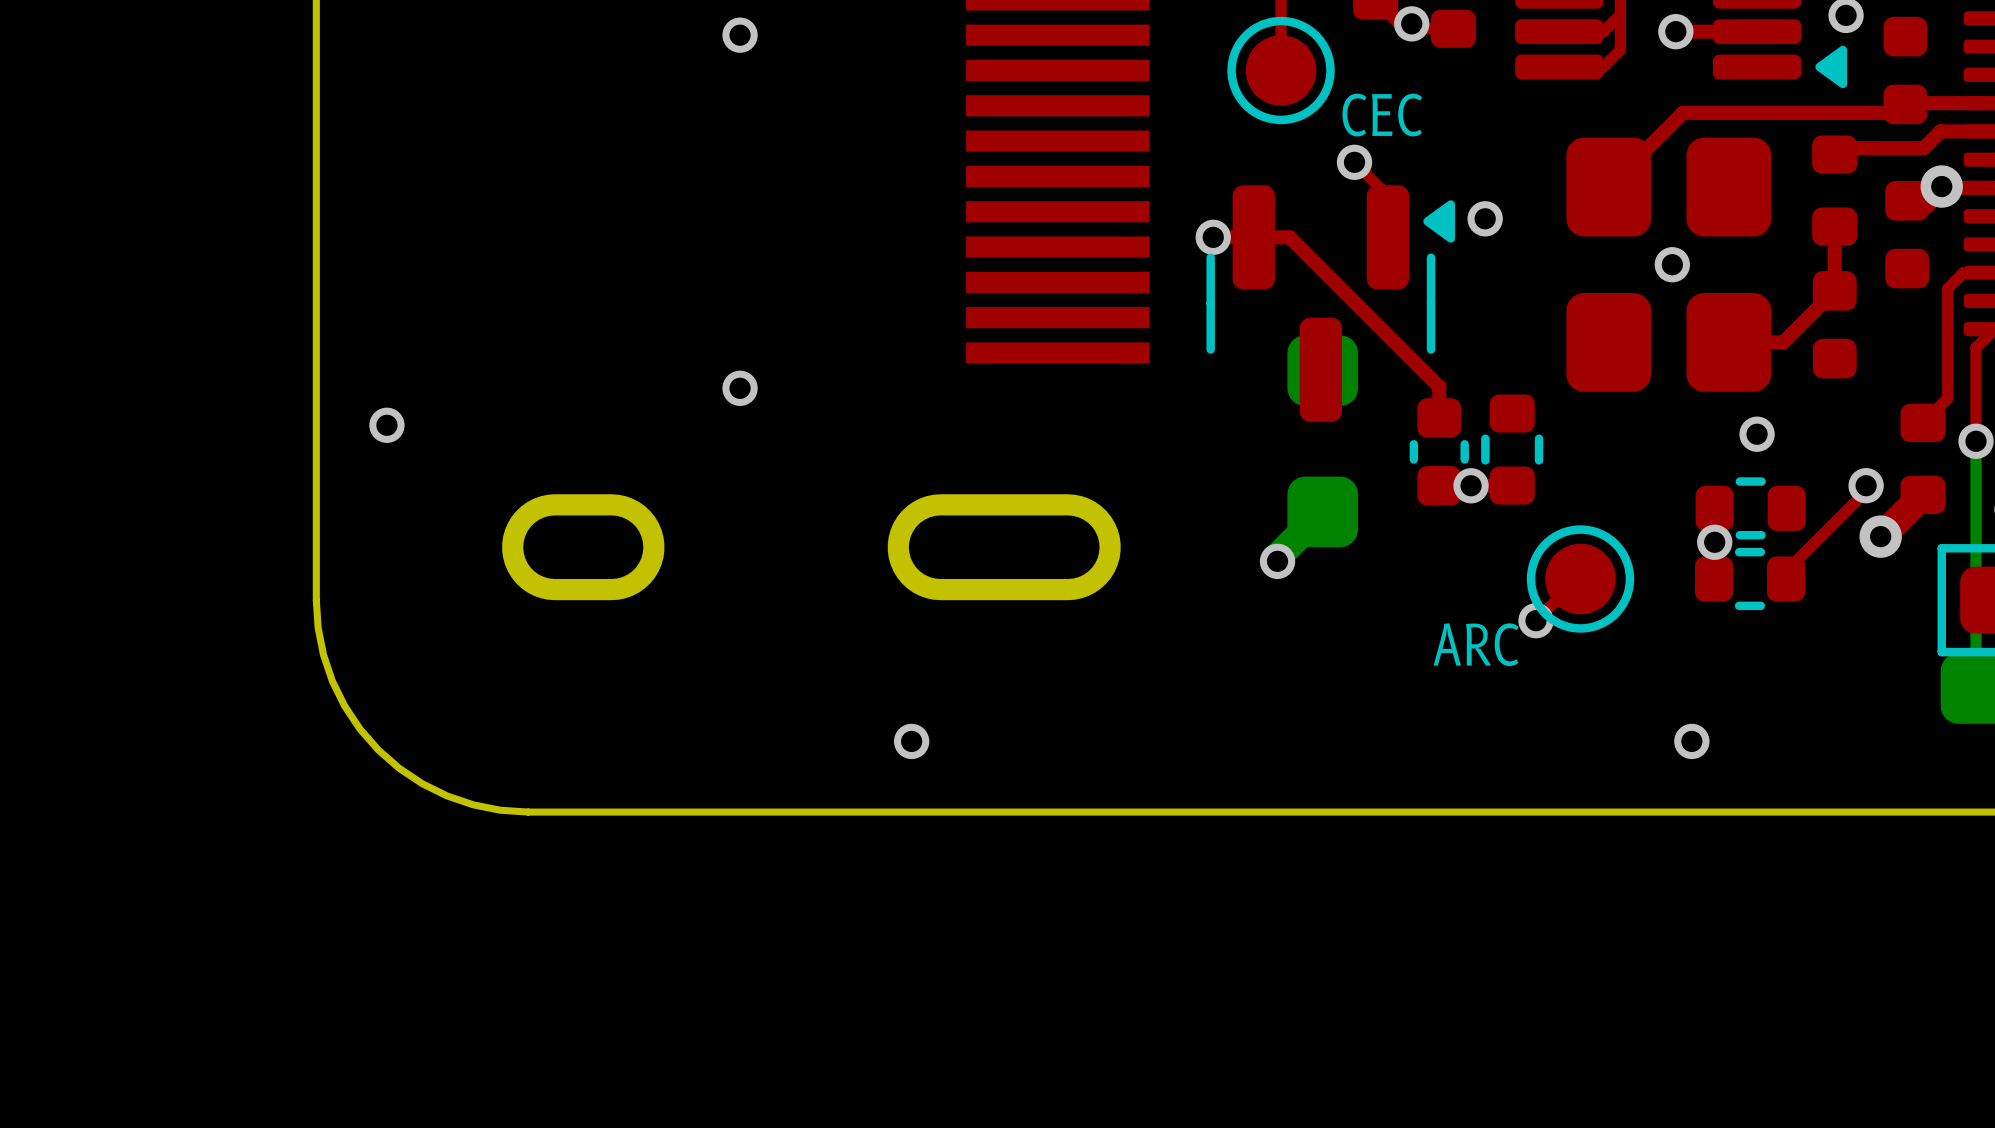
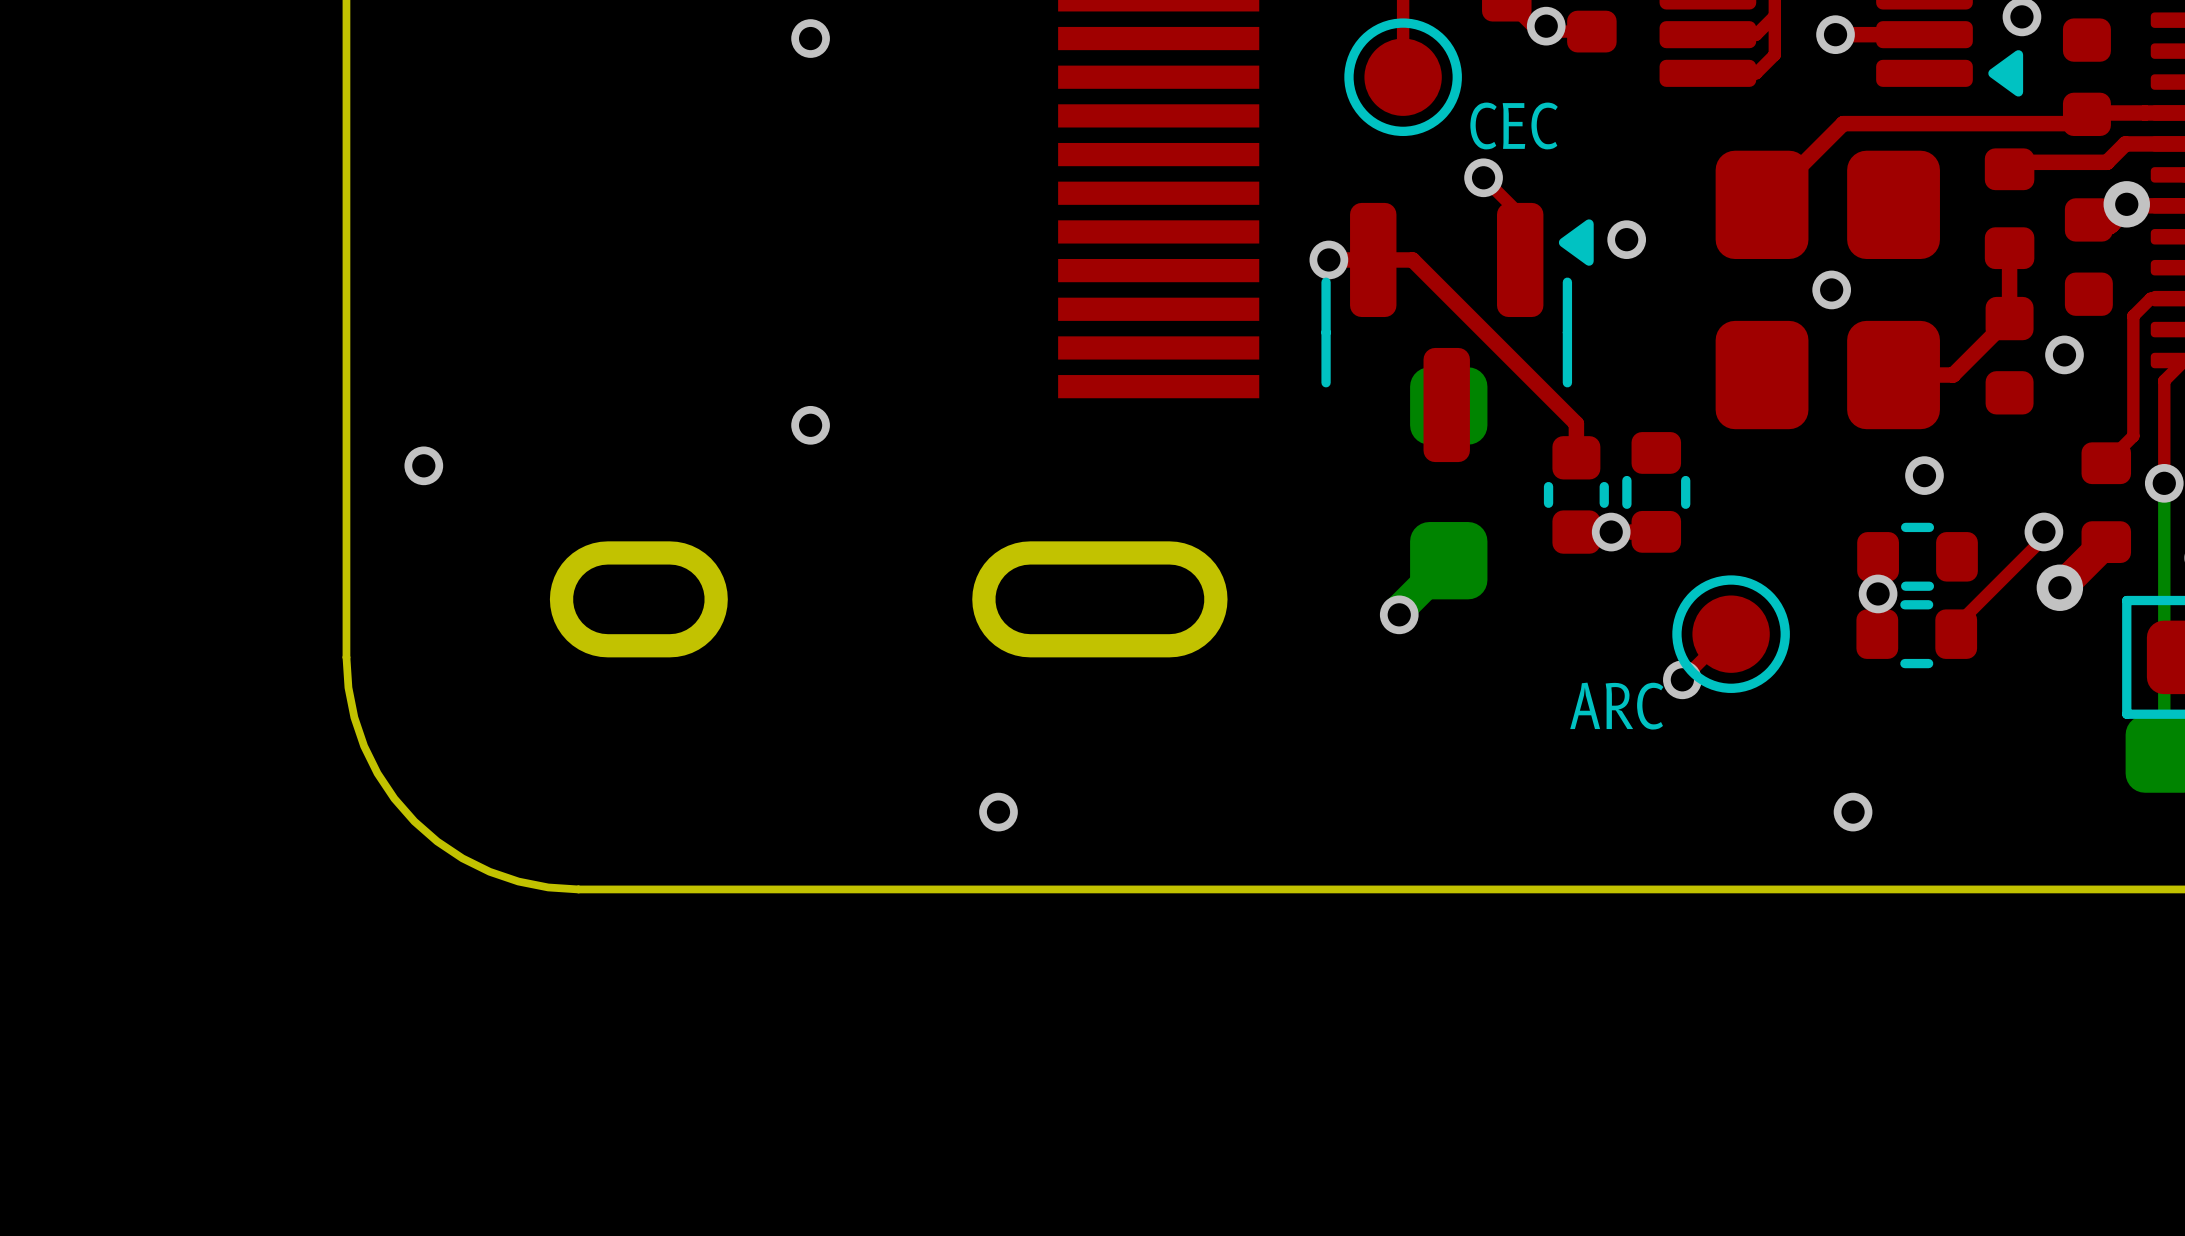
via: none -> (2064, 354)

